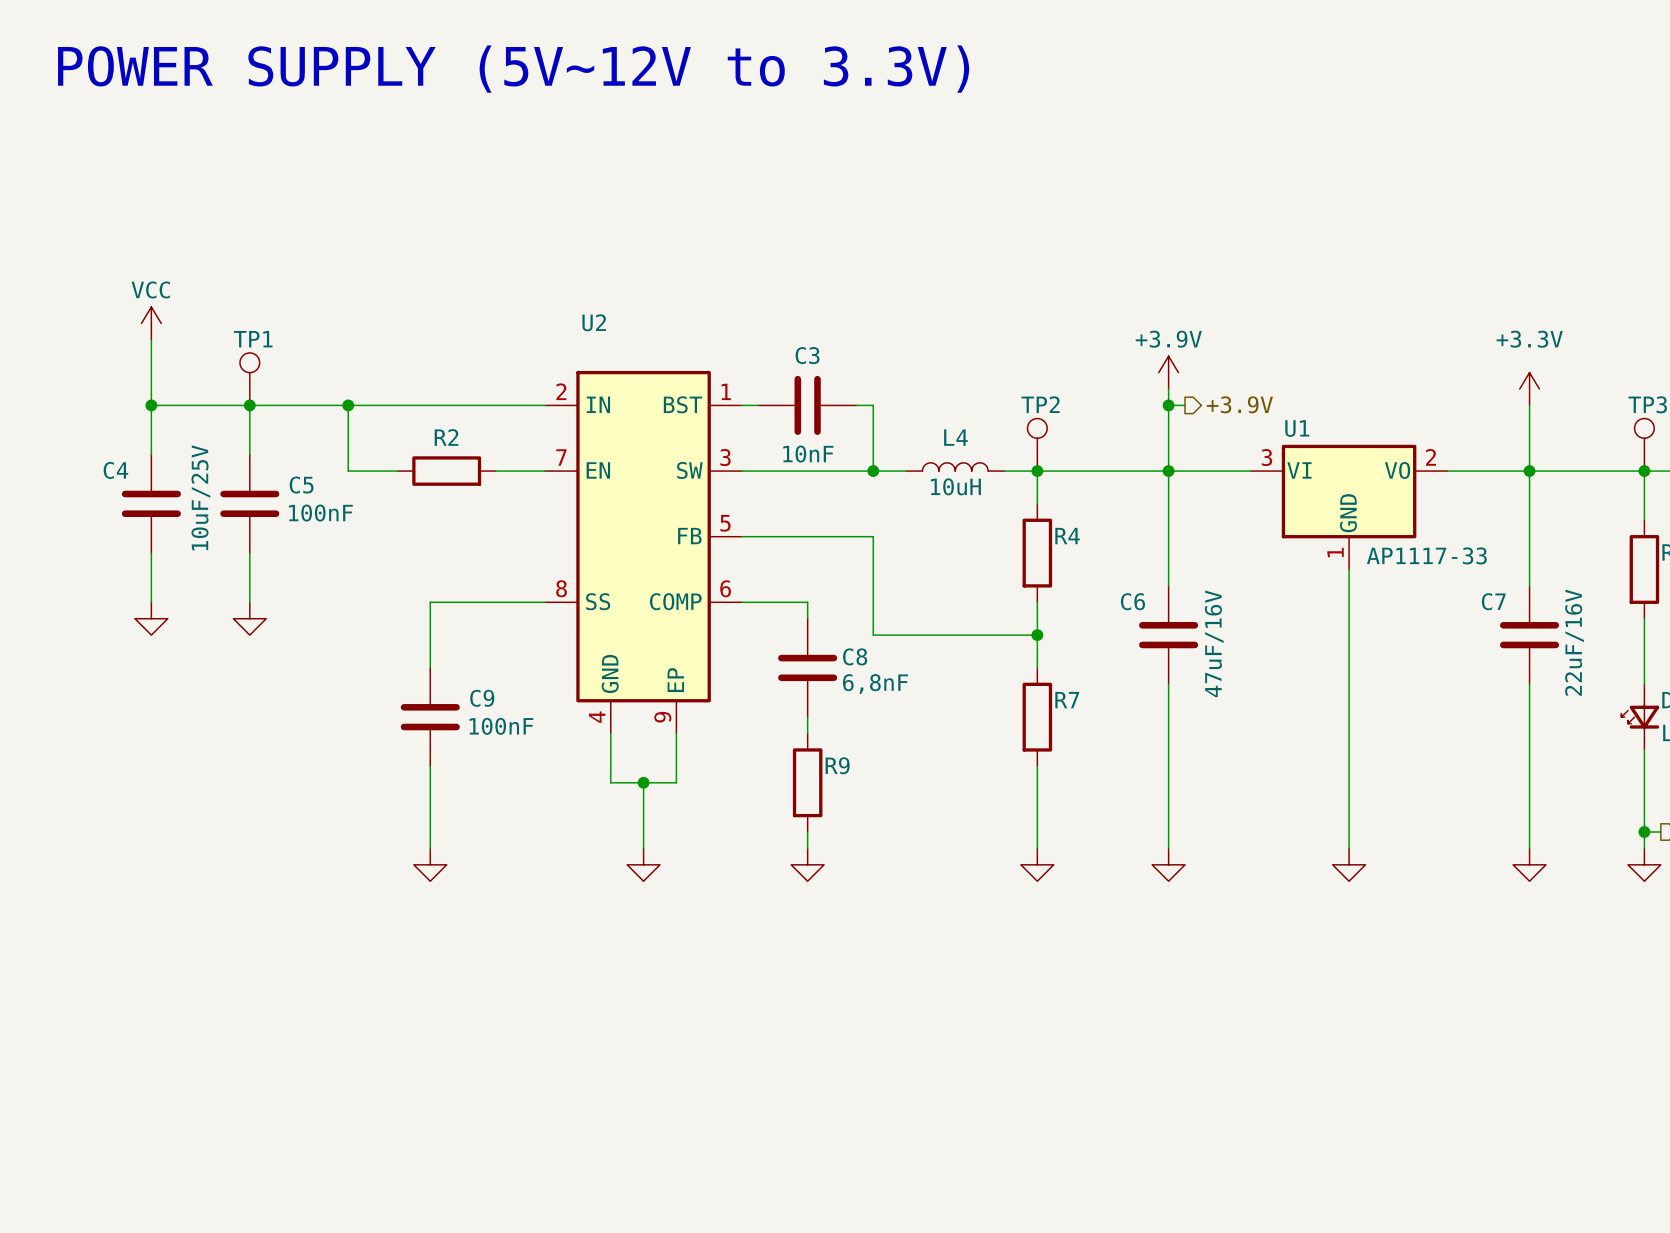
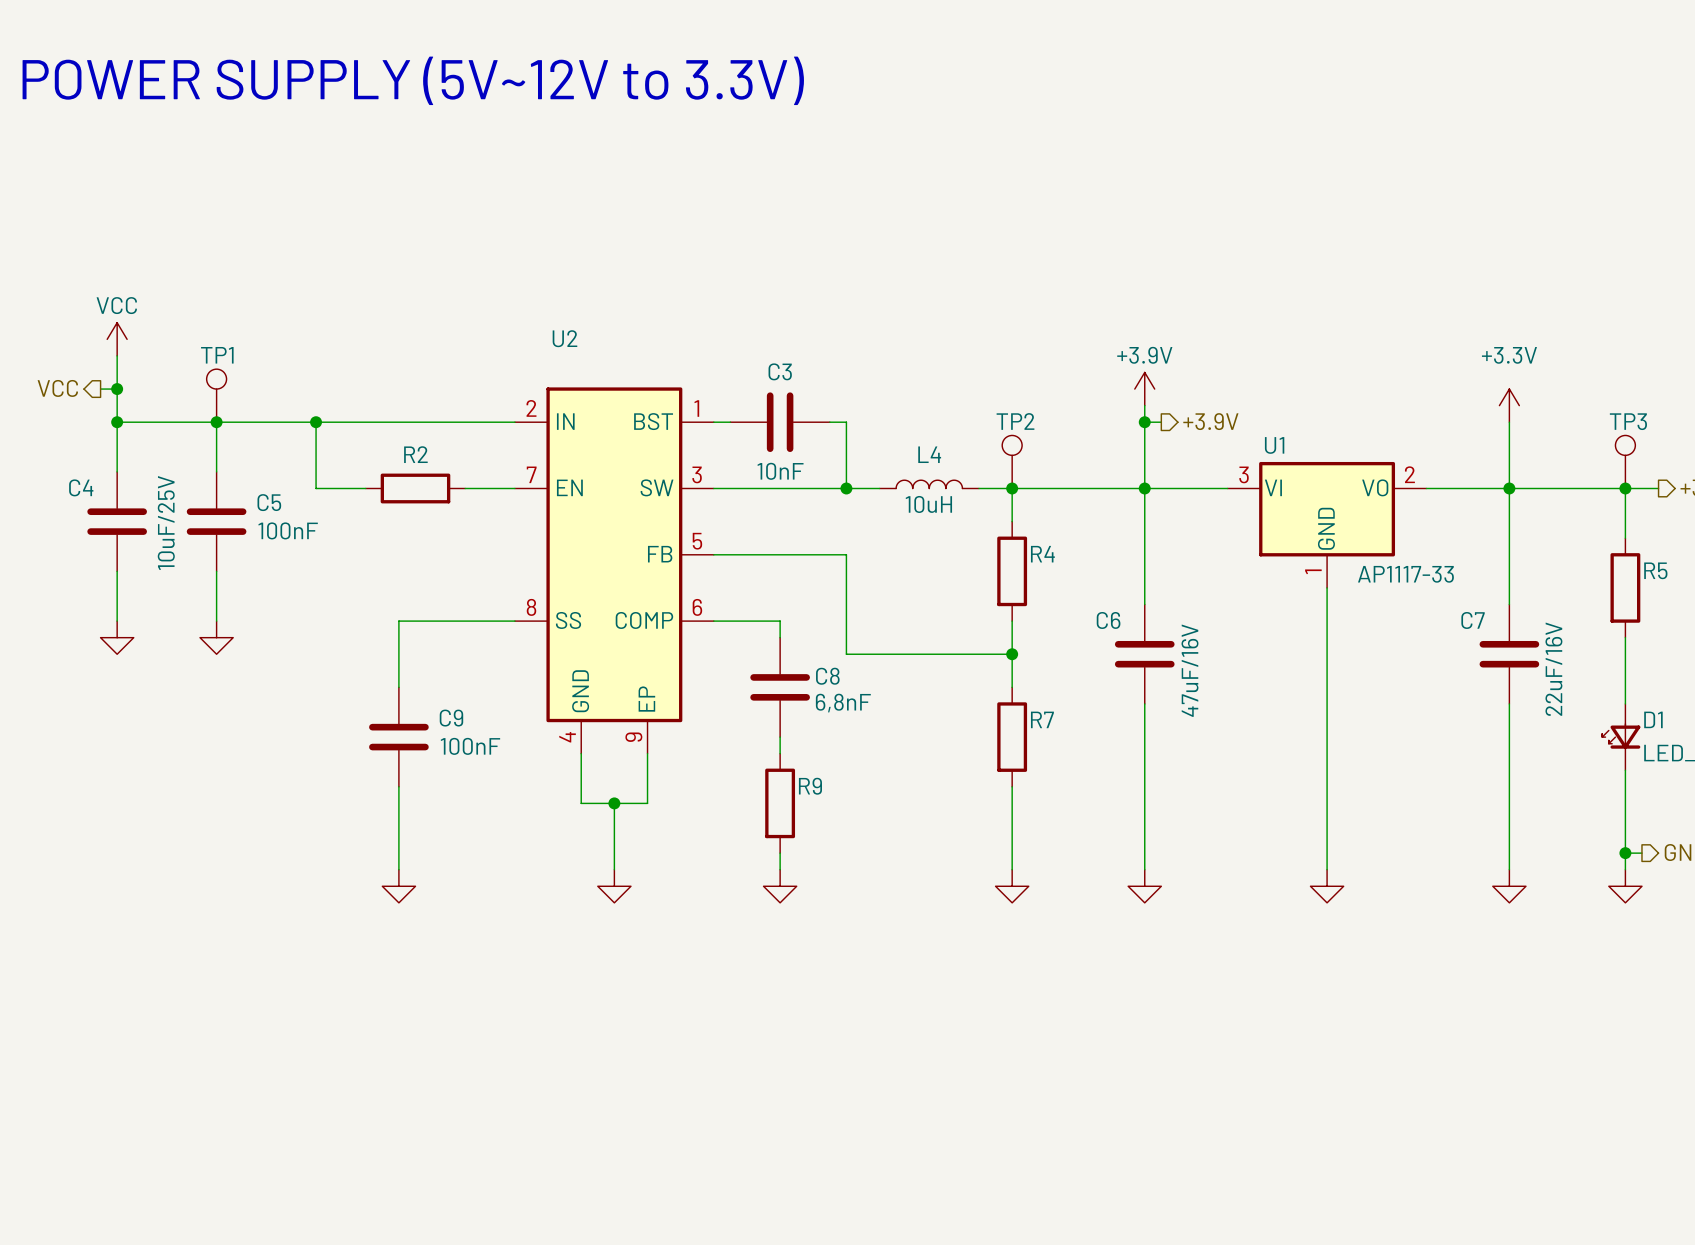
hierarchical label: none -> VCC (57, 388)
wire: none -> (100, 389) (117, 389)
junction: none -> (117, 389)

